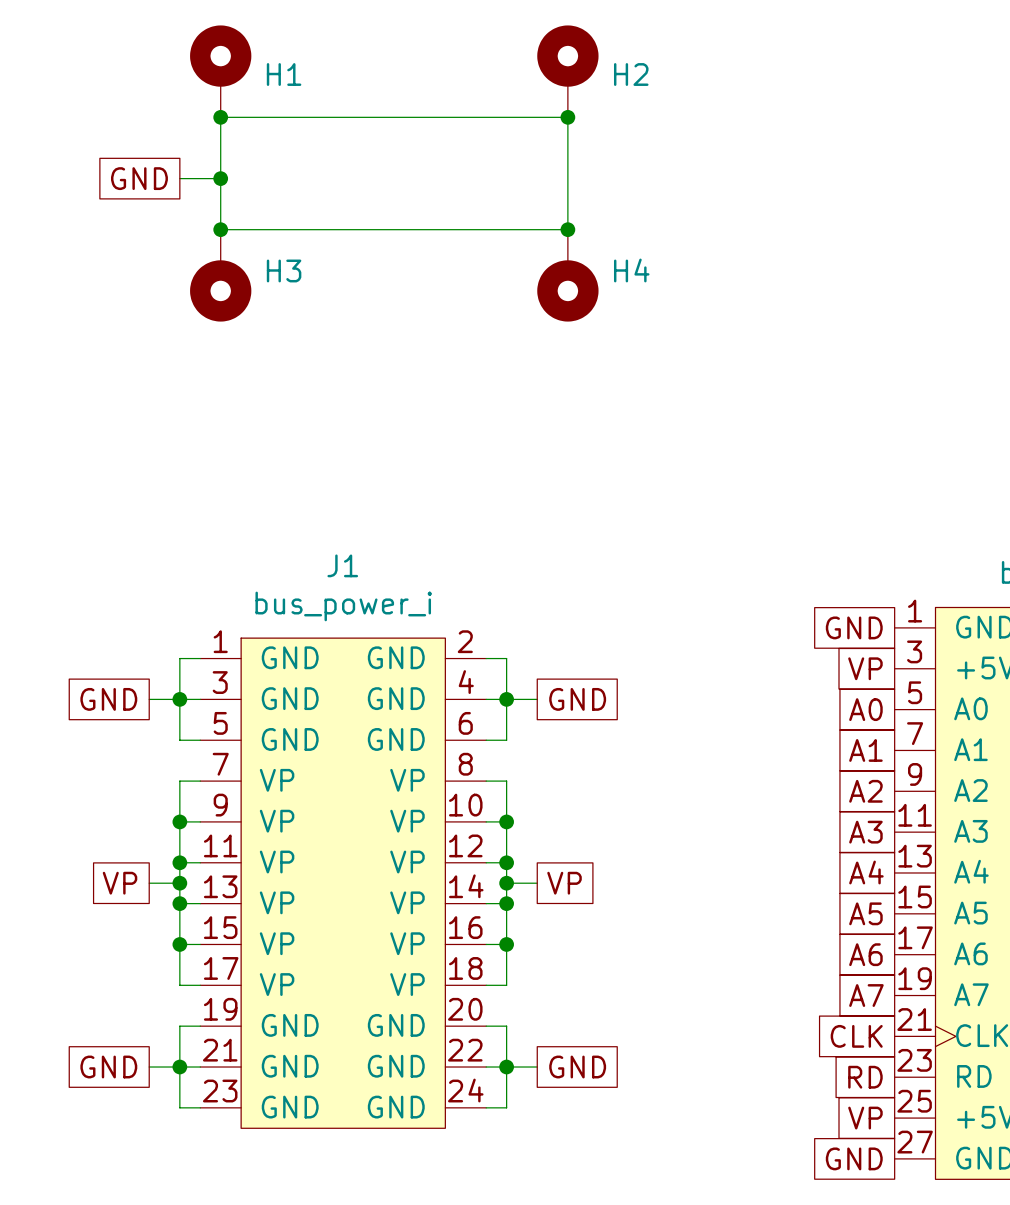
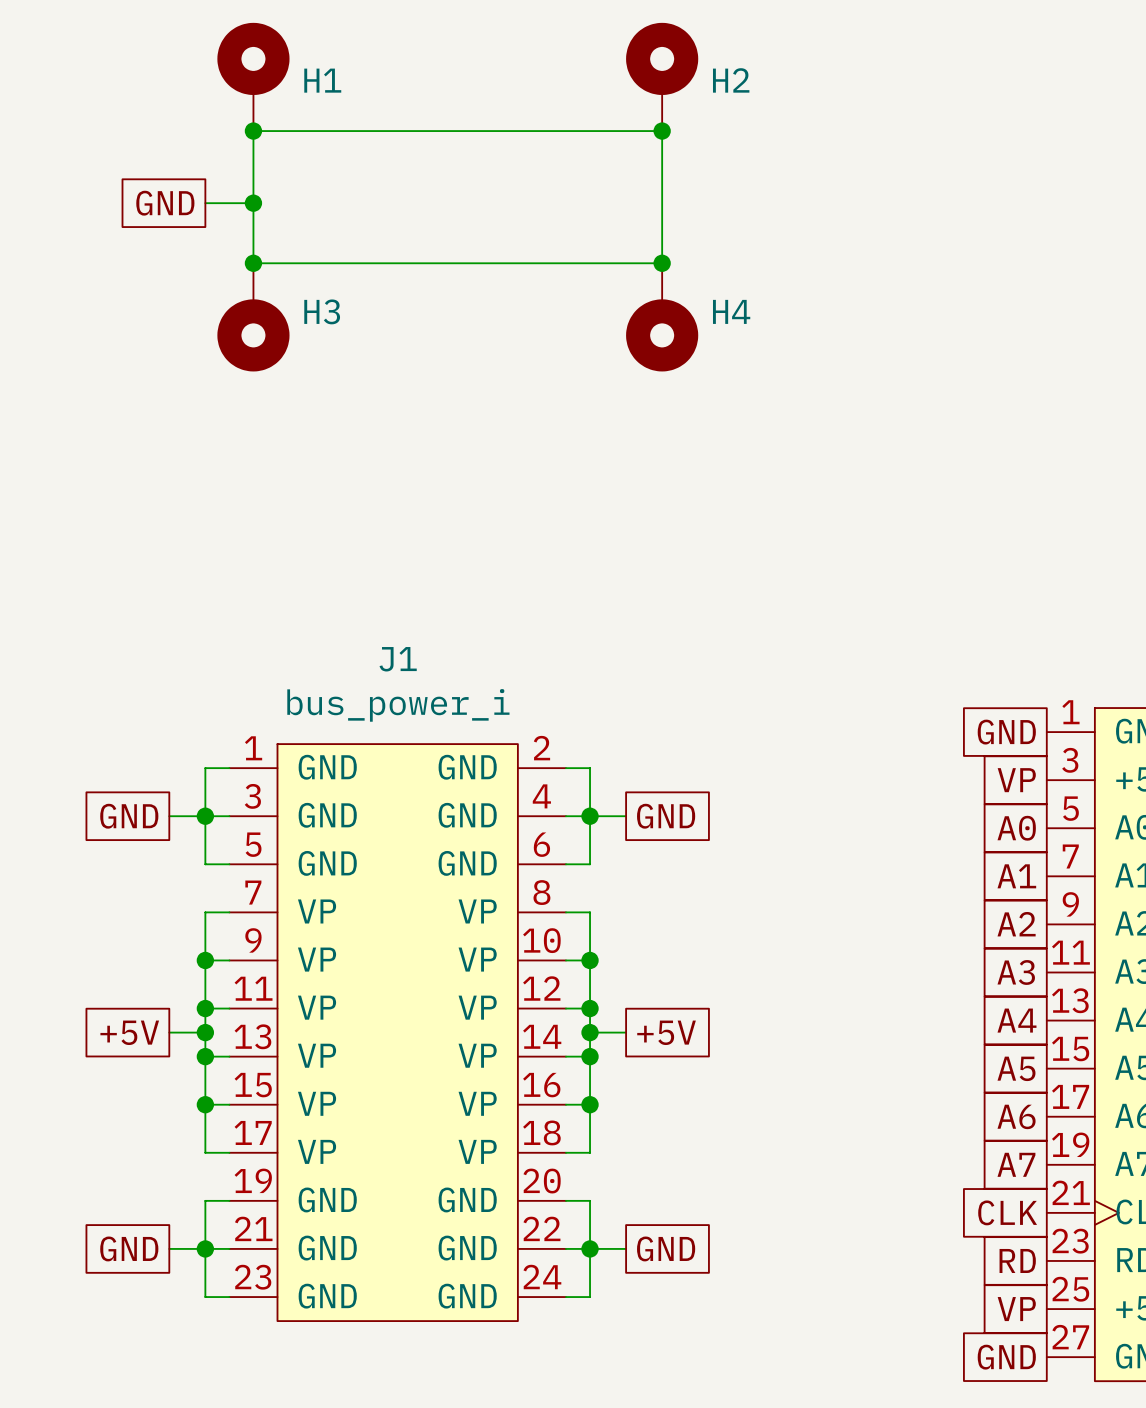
global label: VP (120, 883) -> +5V (129, 1032)
global label: VP (564, 883) -> +5V (666, 1032)

